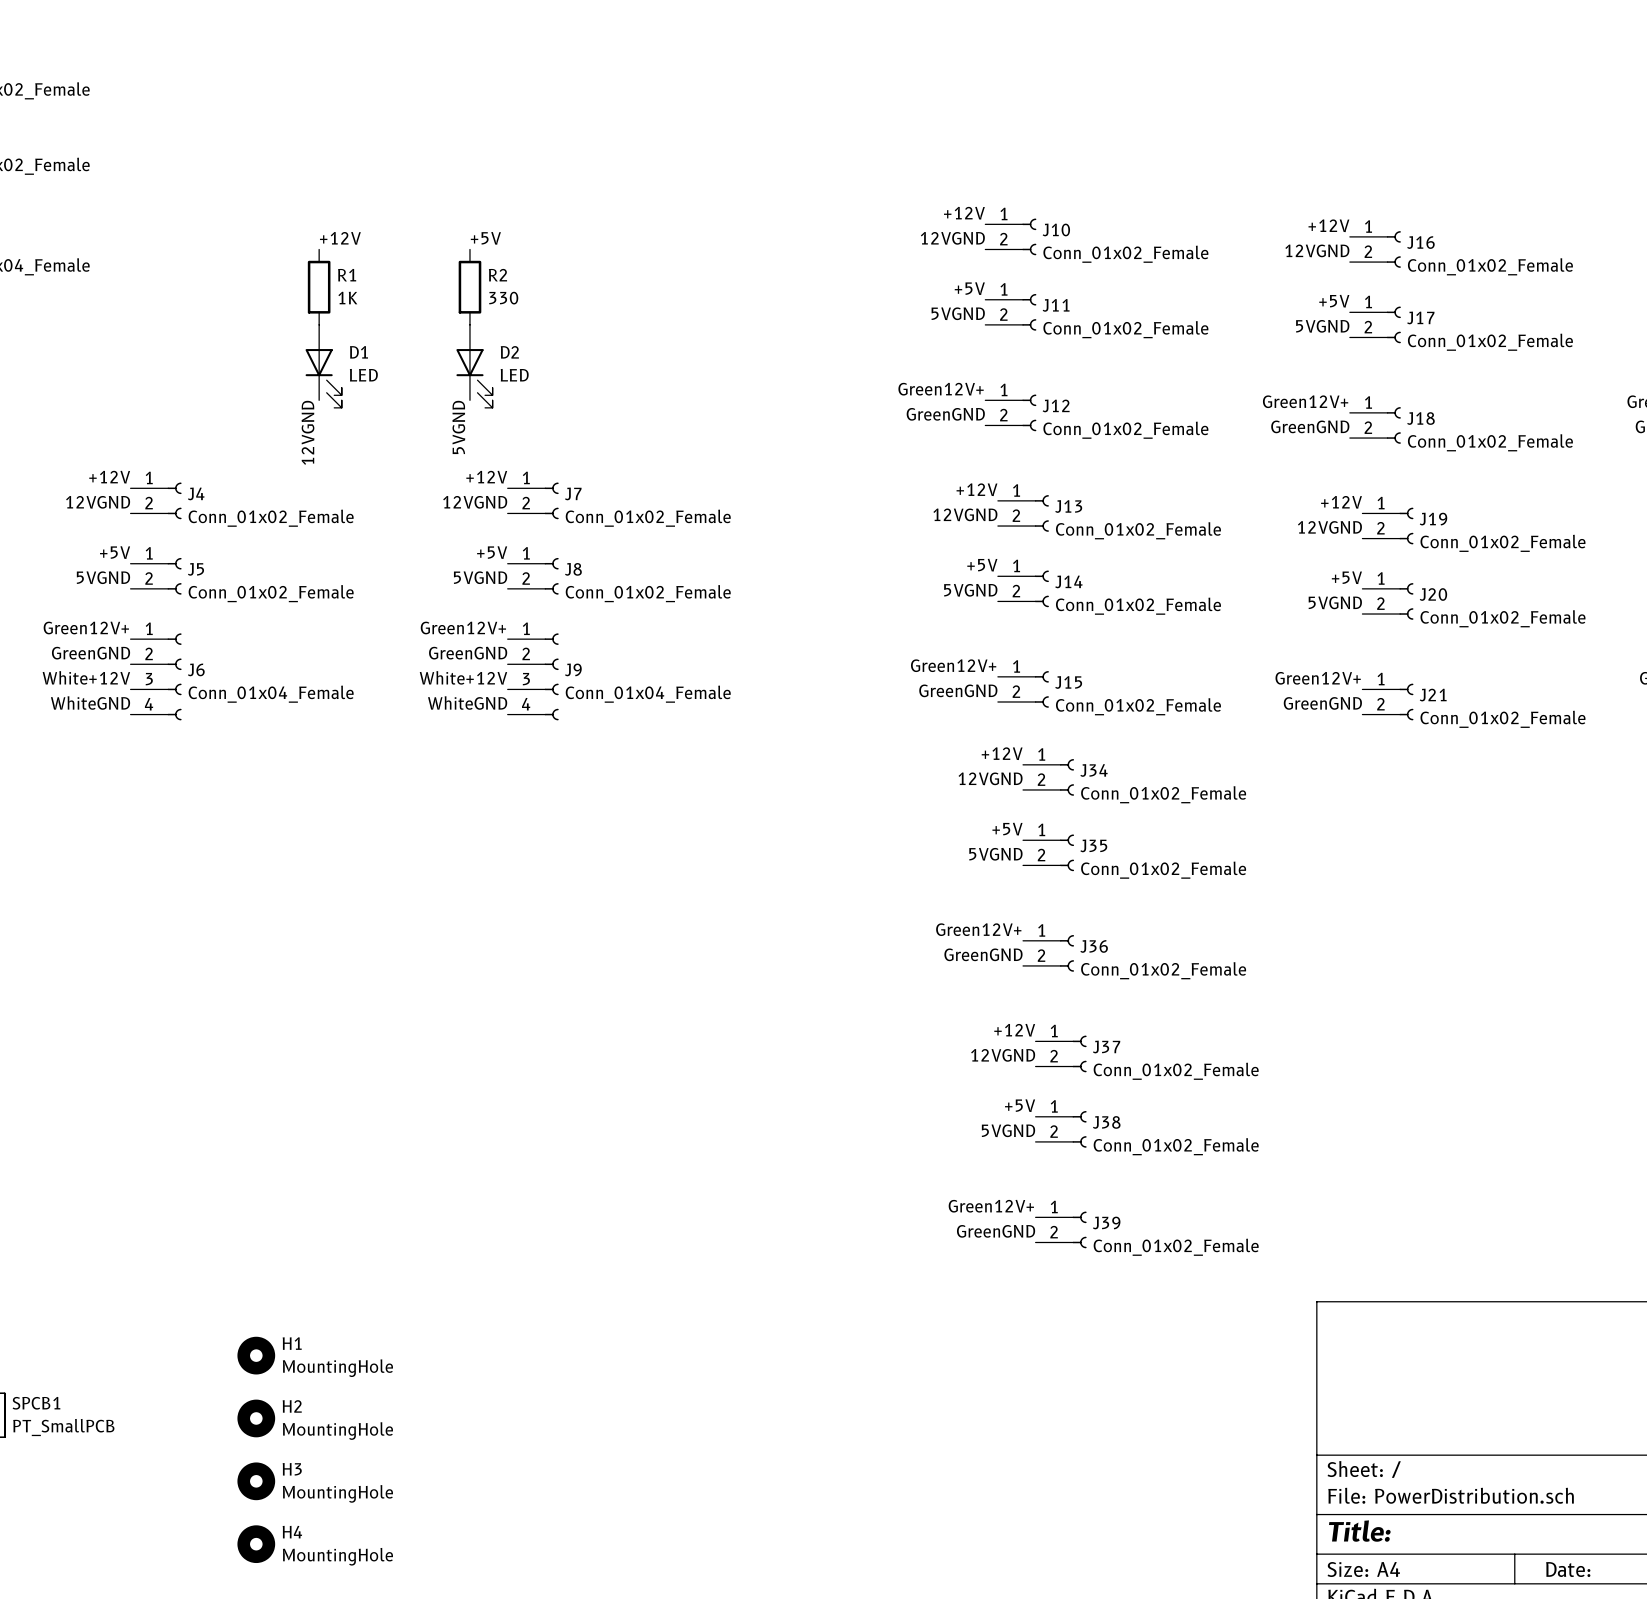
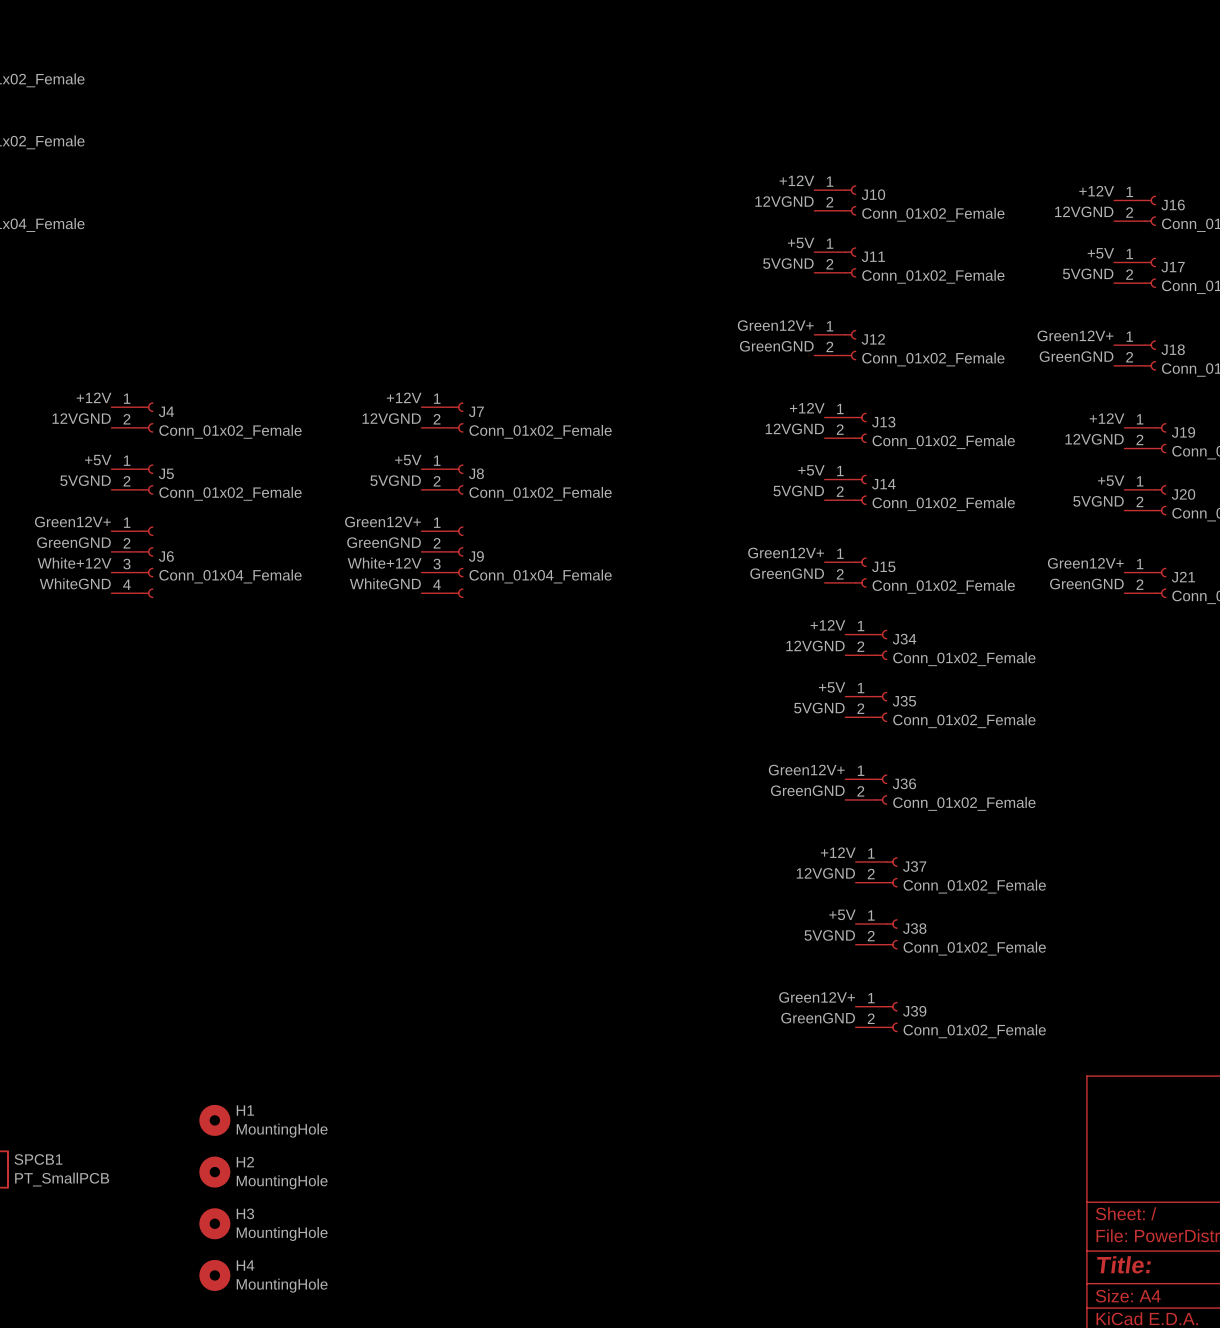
label: +12V (340, 238) -> none
label: +5V (485, 238) -> none
R1: 1K (319, 287) -> none
R2: 330 (469, 287) -> none
D1: LED (323, 366) -> none
D2: LED (474, 366) -> none
label: 5VGND (458, 427) -> none
label: 12VGND (308, 432) -> none

